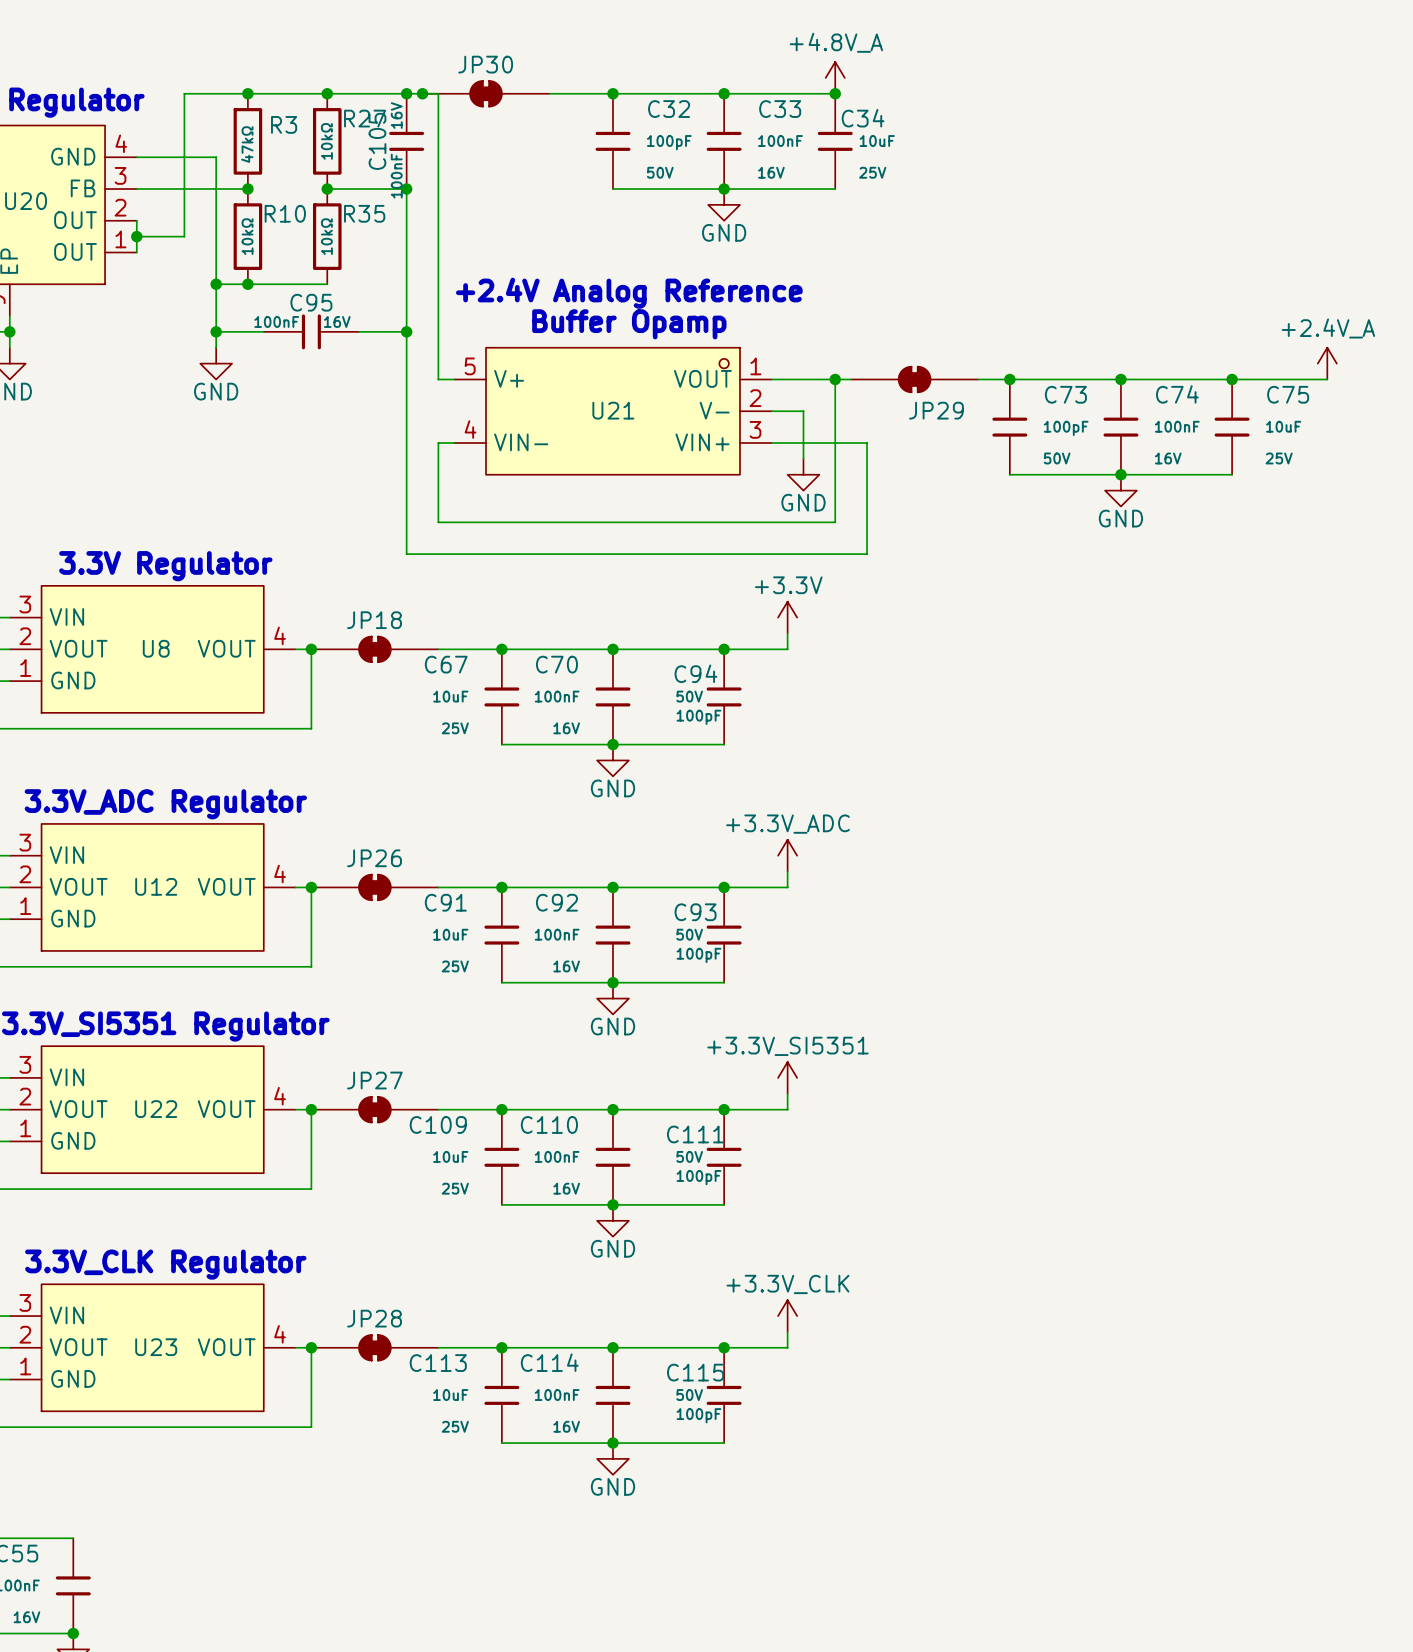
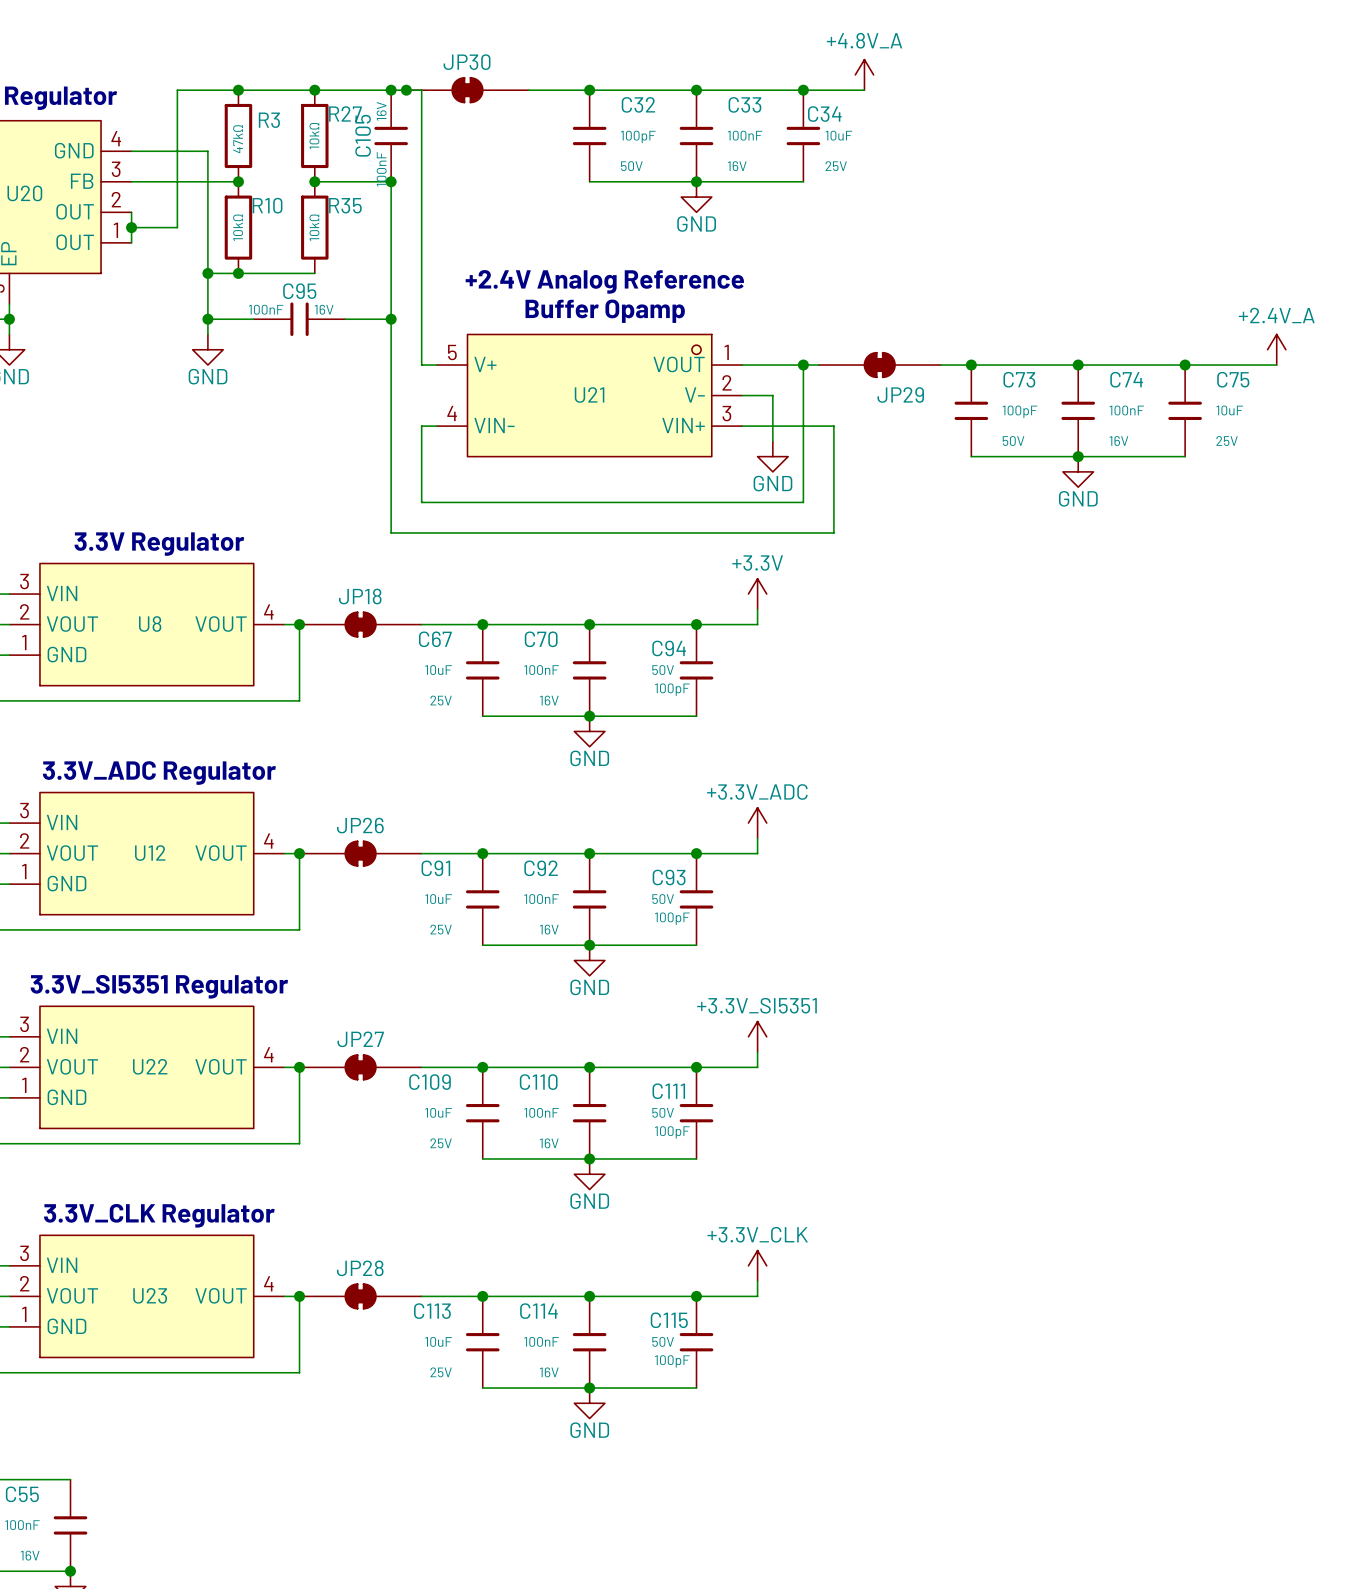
power symbol position: +4.8V_A (835, 77) -> +4.8V_A (864, 74)
wire: none -> (803, 90) (864, 90)

